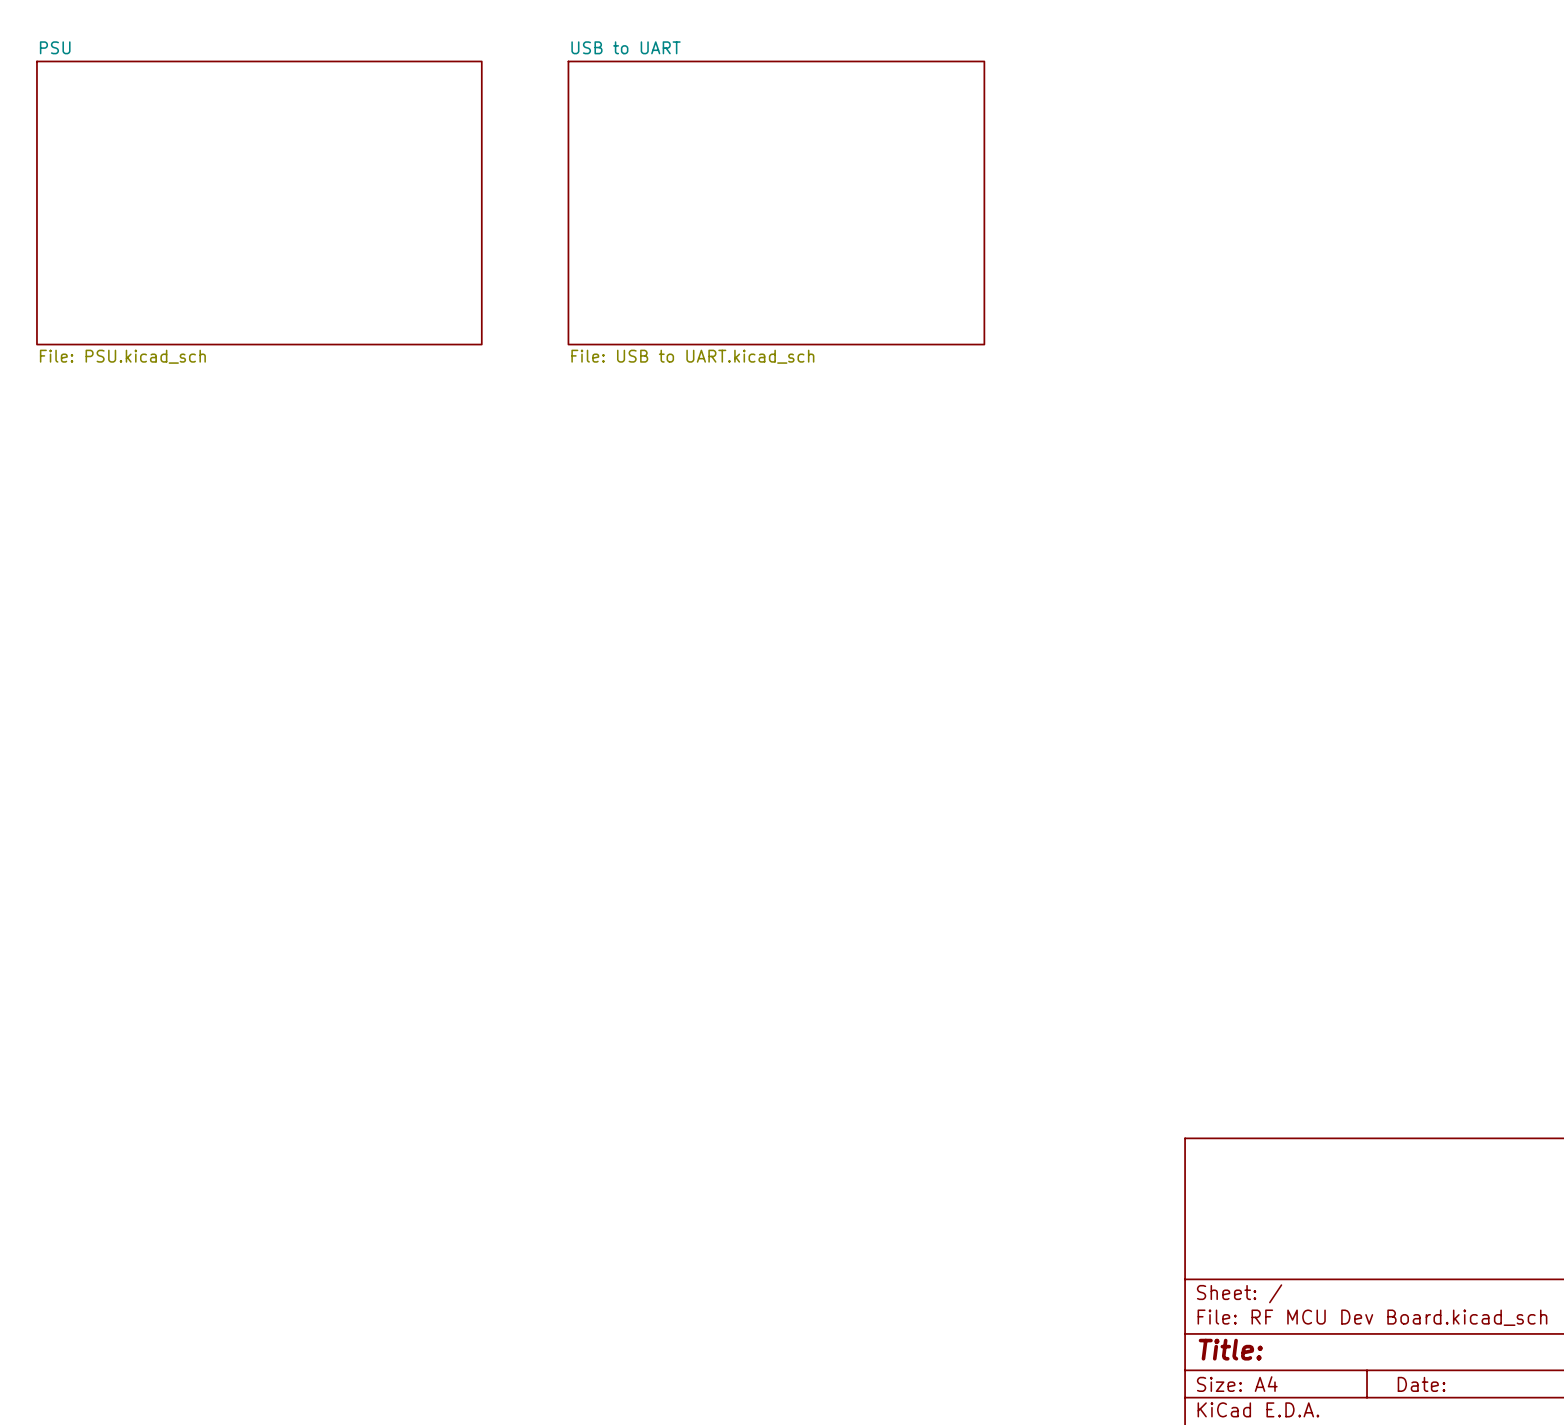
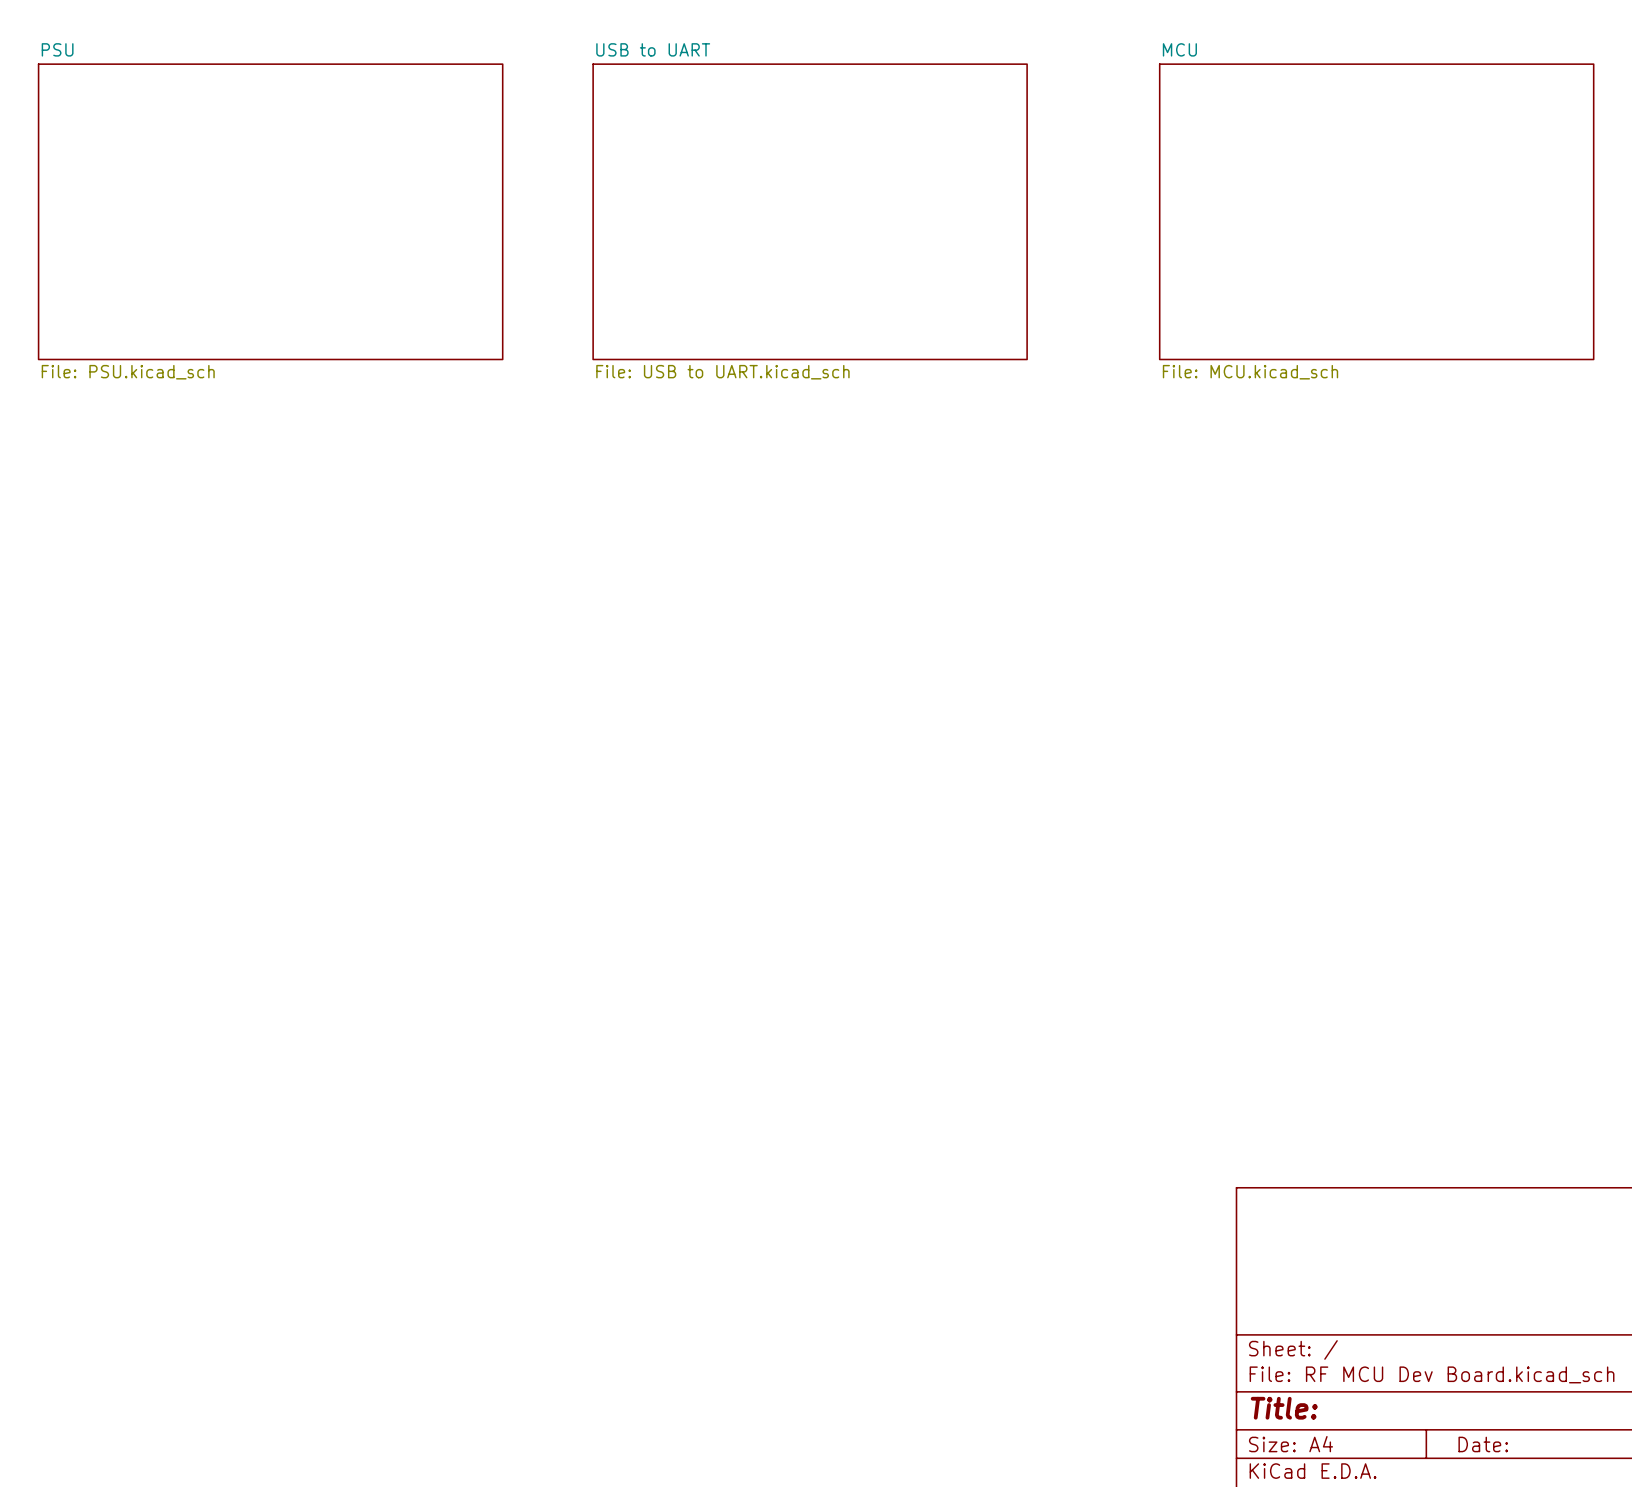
sheet MCU: none -> File: MCU.kicad_sch (1376, 211)

